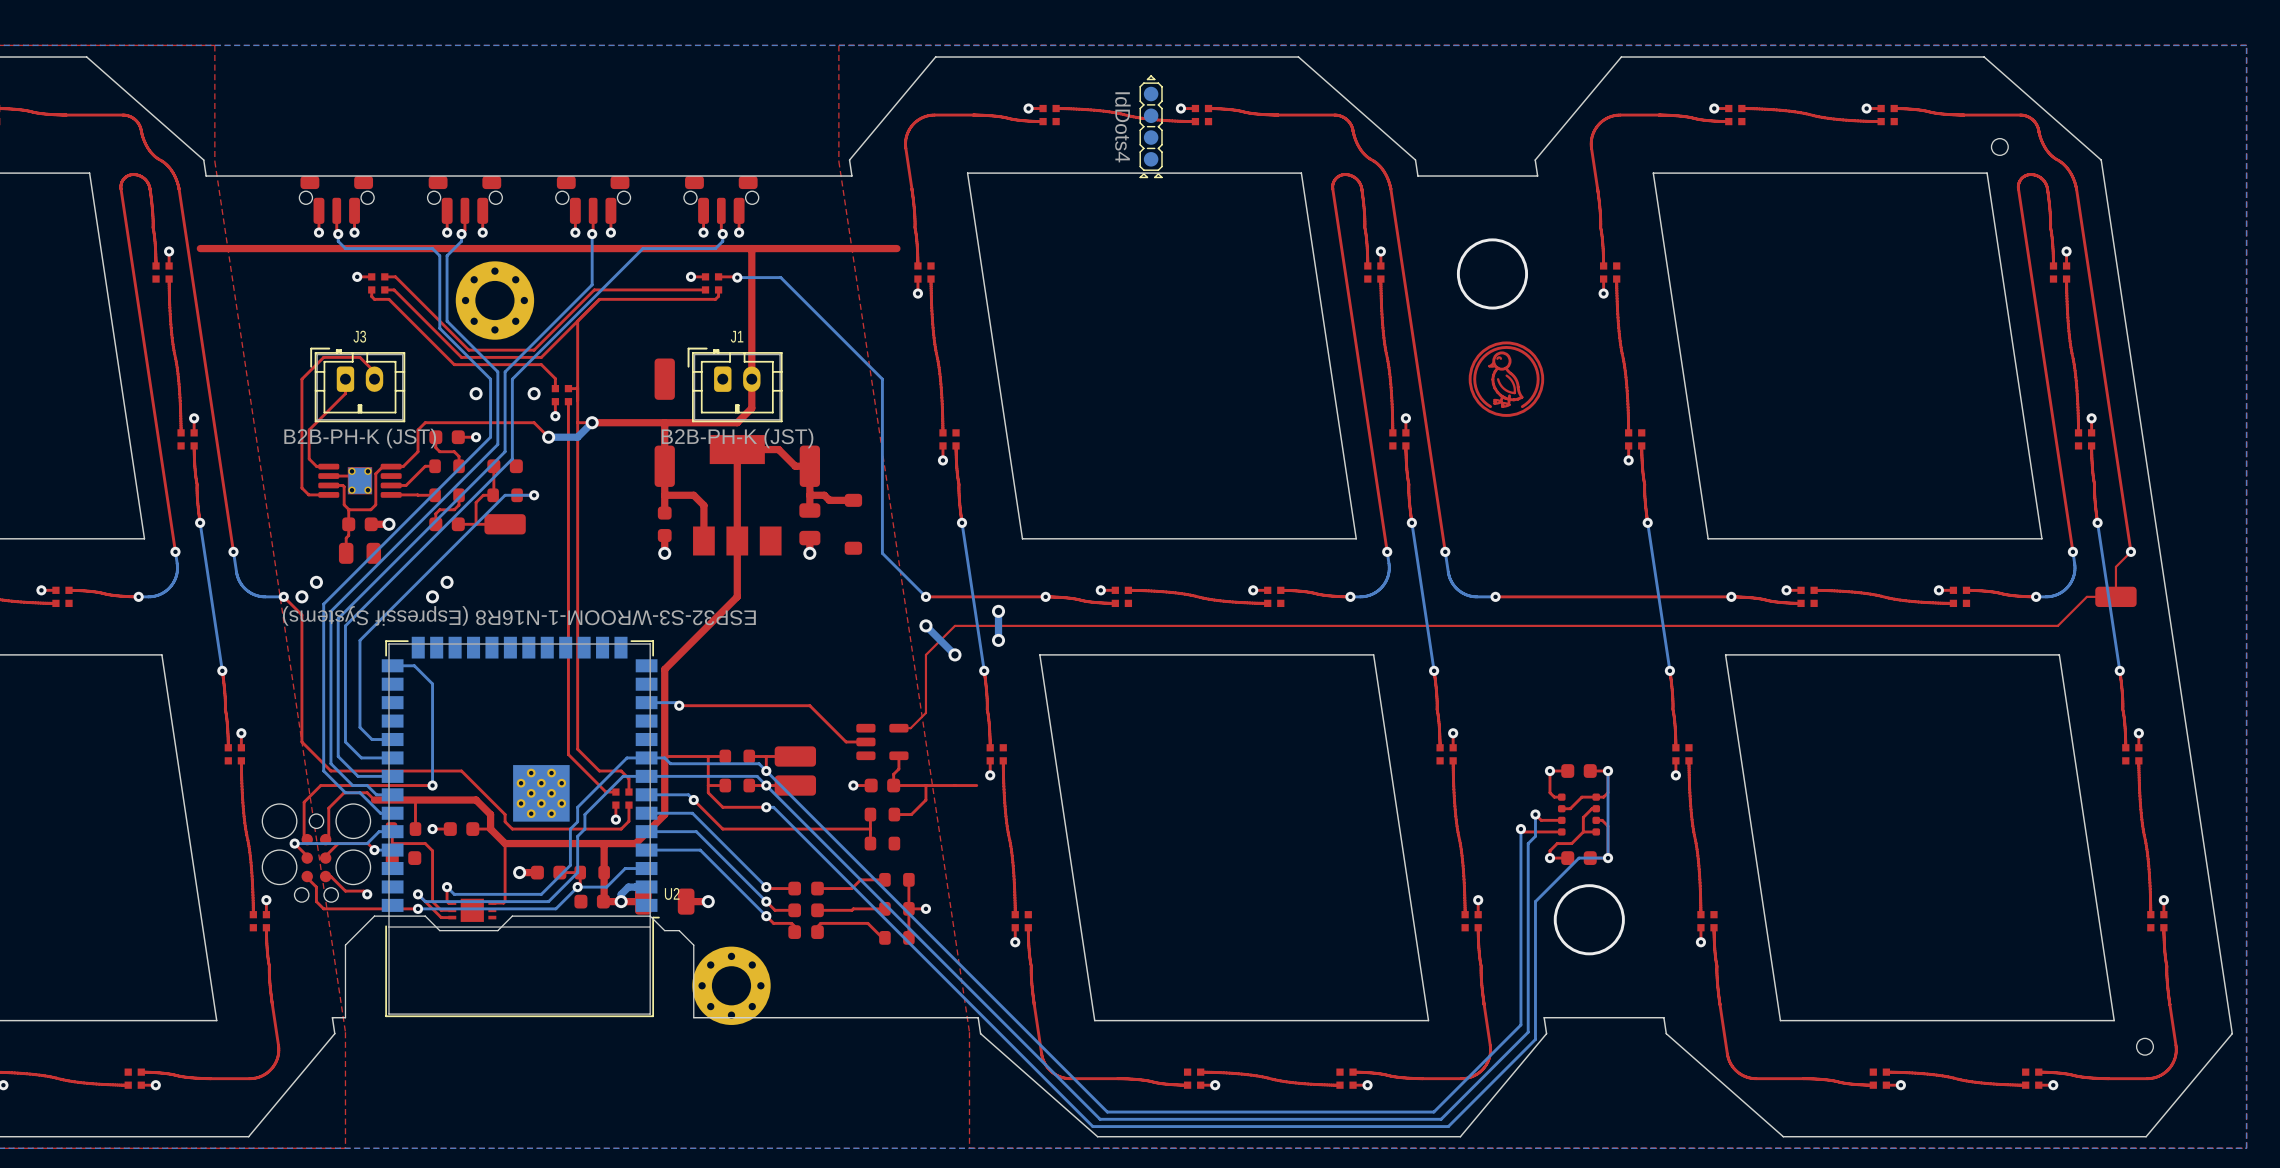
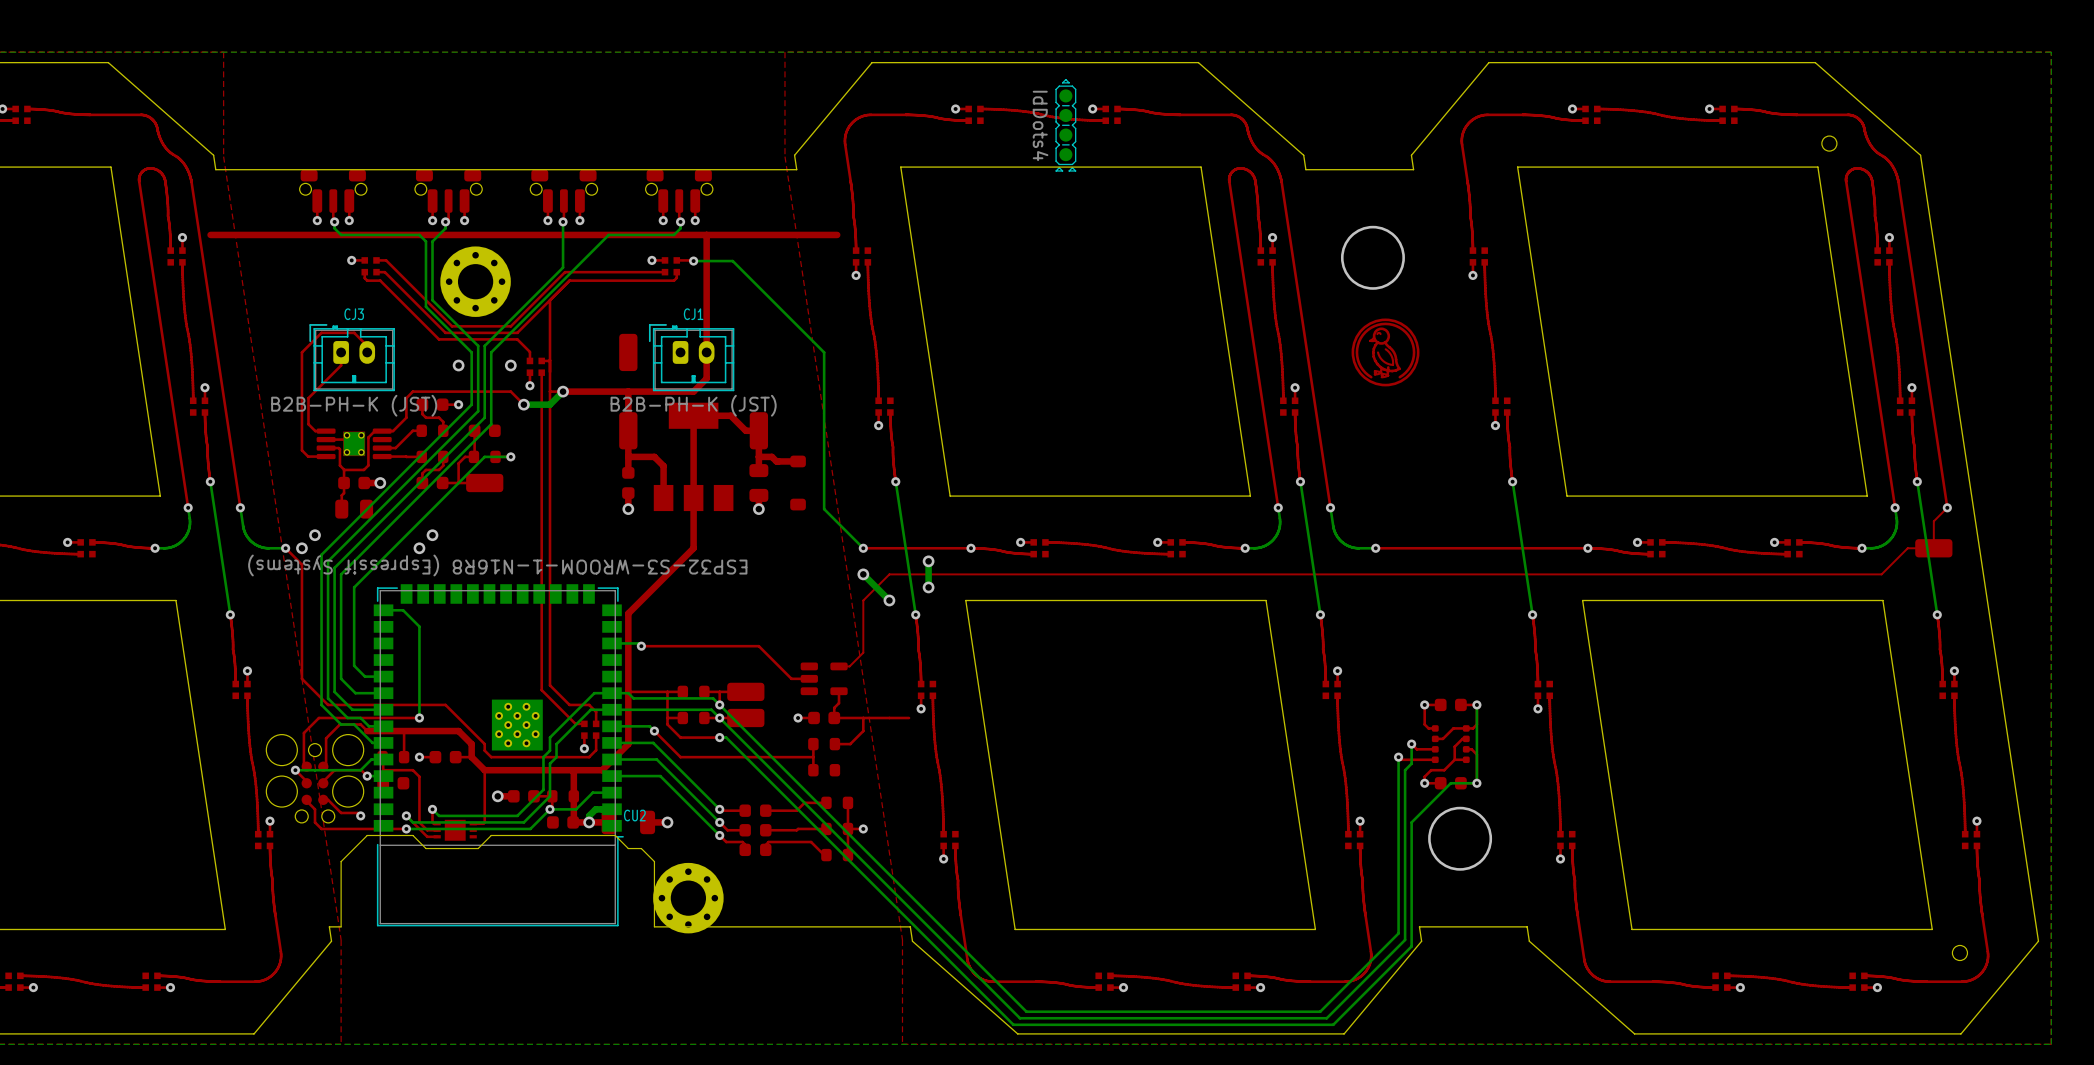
J3 name: J3 (359, 336) -> CJ3 (354, 314)
J1 name: J1 (737, 336) -> CJ1 (693, 314)
U2 name: U2 (672, 893) -> CU2 (634, 815)

